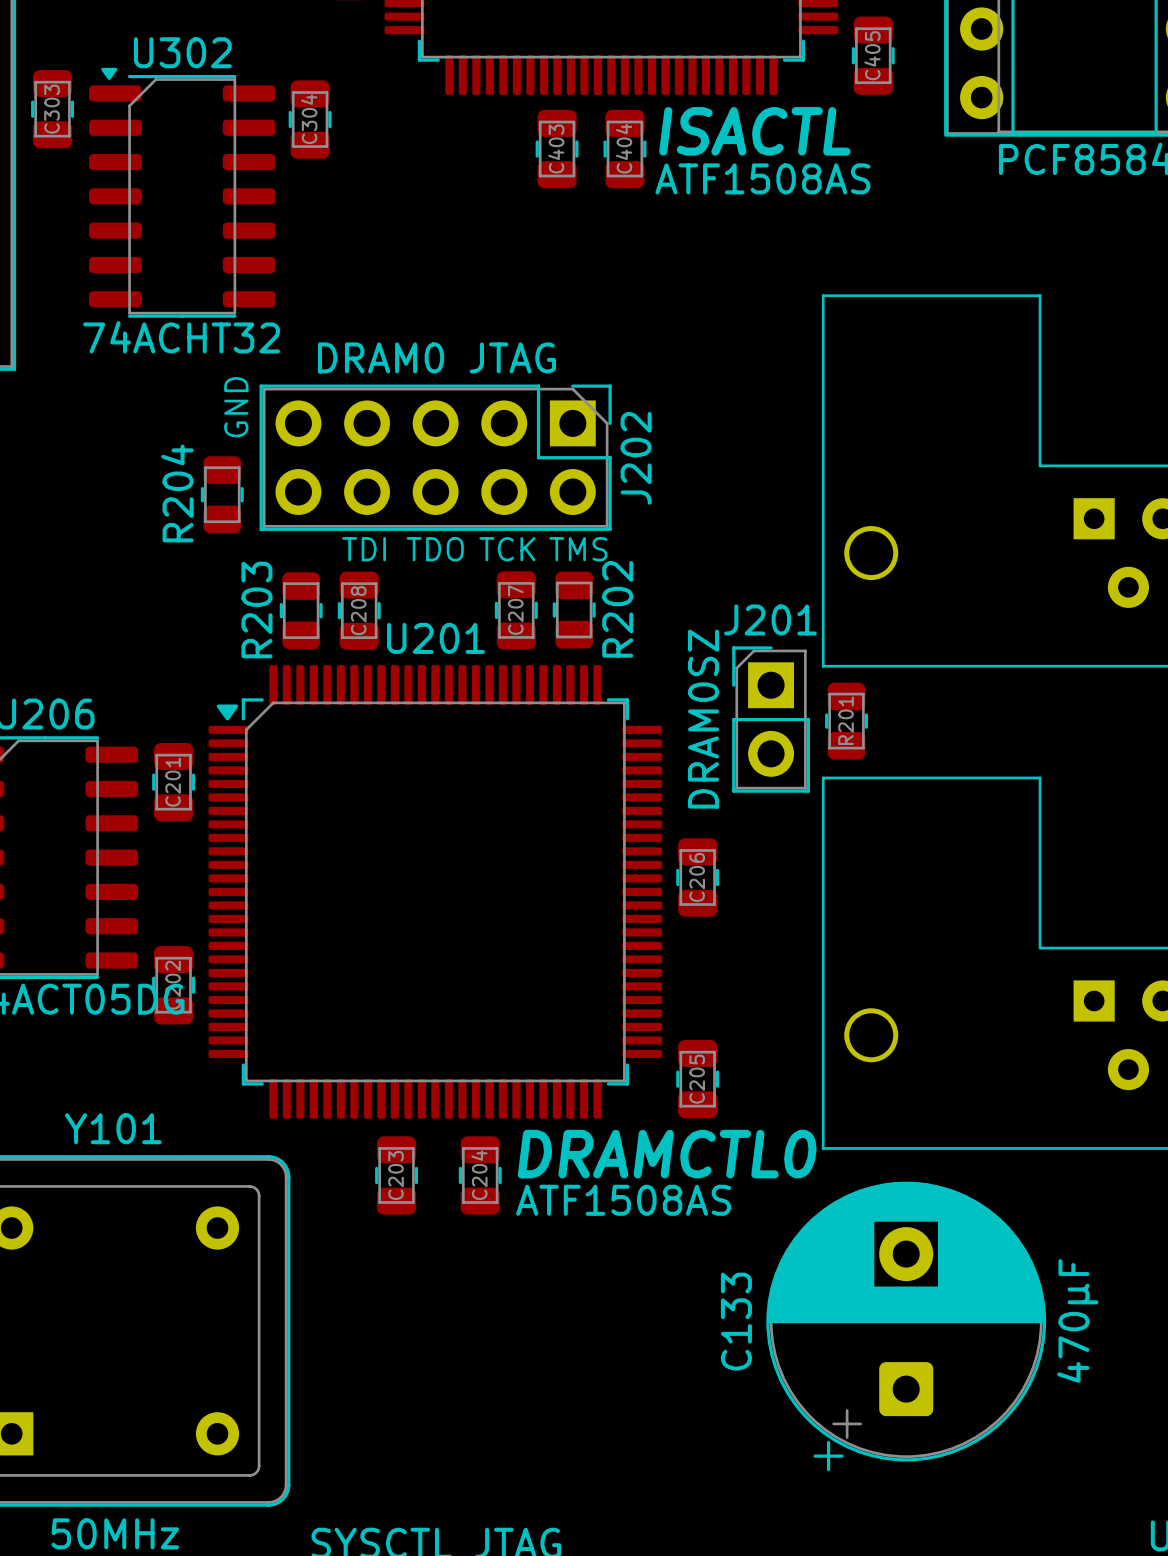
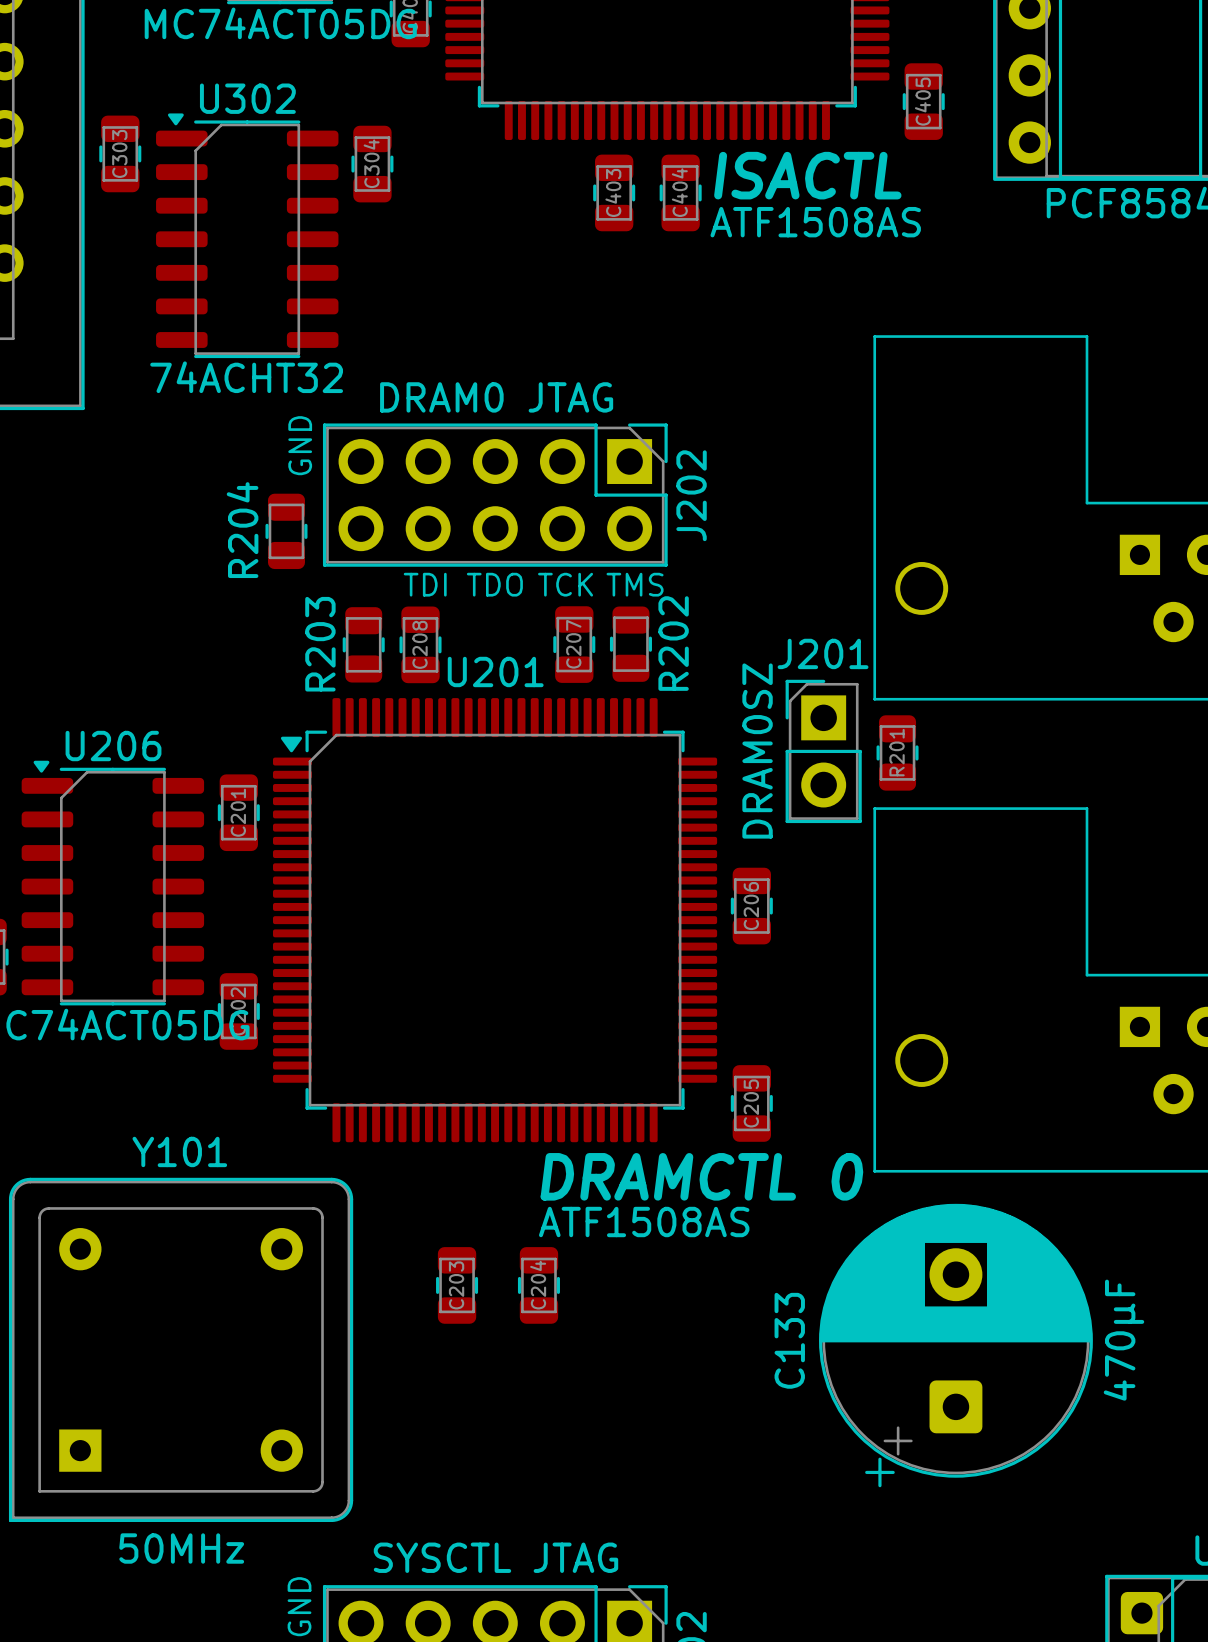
text: DRAMCTL0 (667, 1154) -> DRAMCTL 0 (701, 1176)
C203 position: (396, 1175) -> (457, 1285)
C204 position: (480, 1175) -> (538, 1285)
U201 value position: ATF1508AS (623, 1200) -> ATF1508AS (644, 1222)

